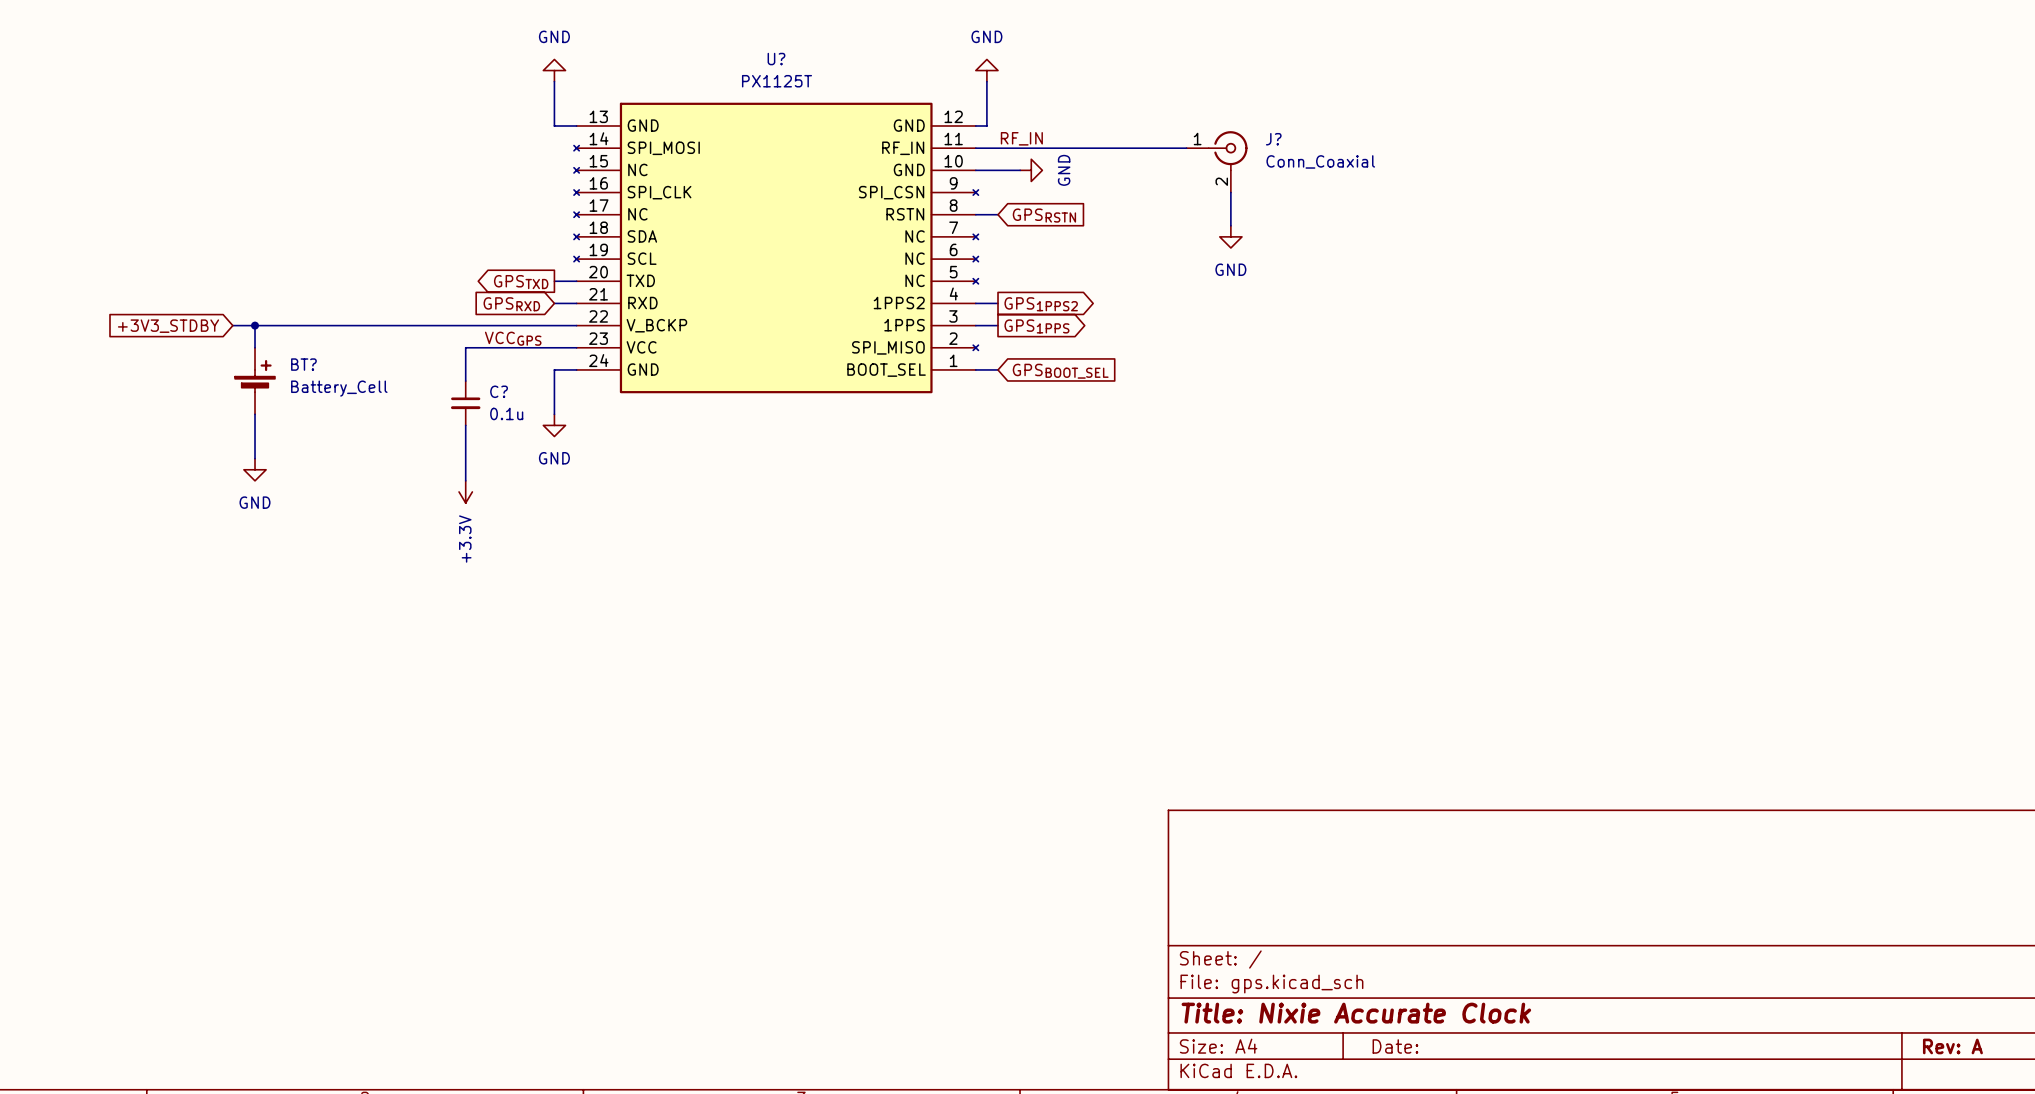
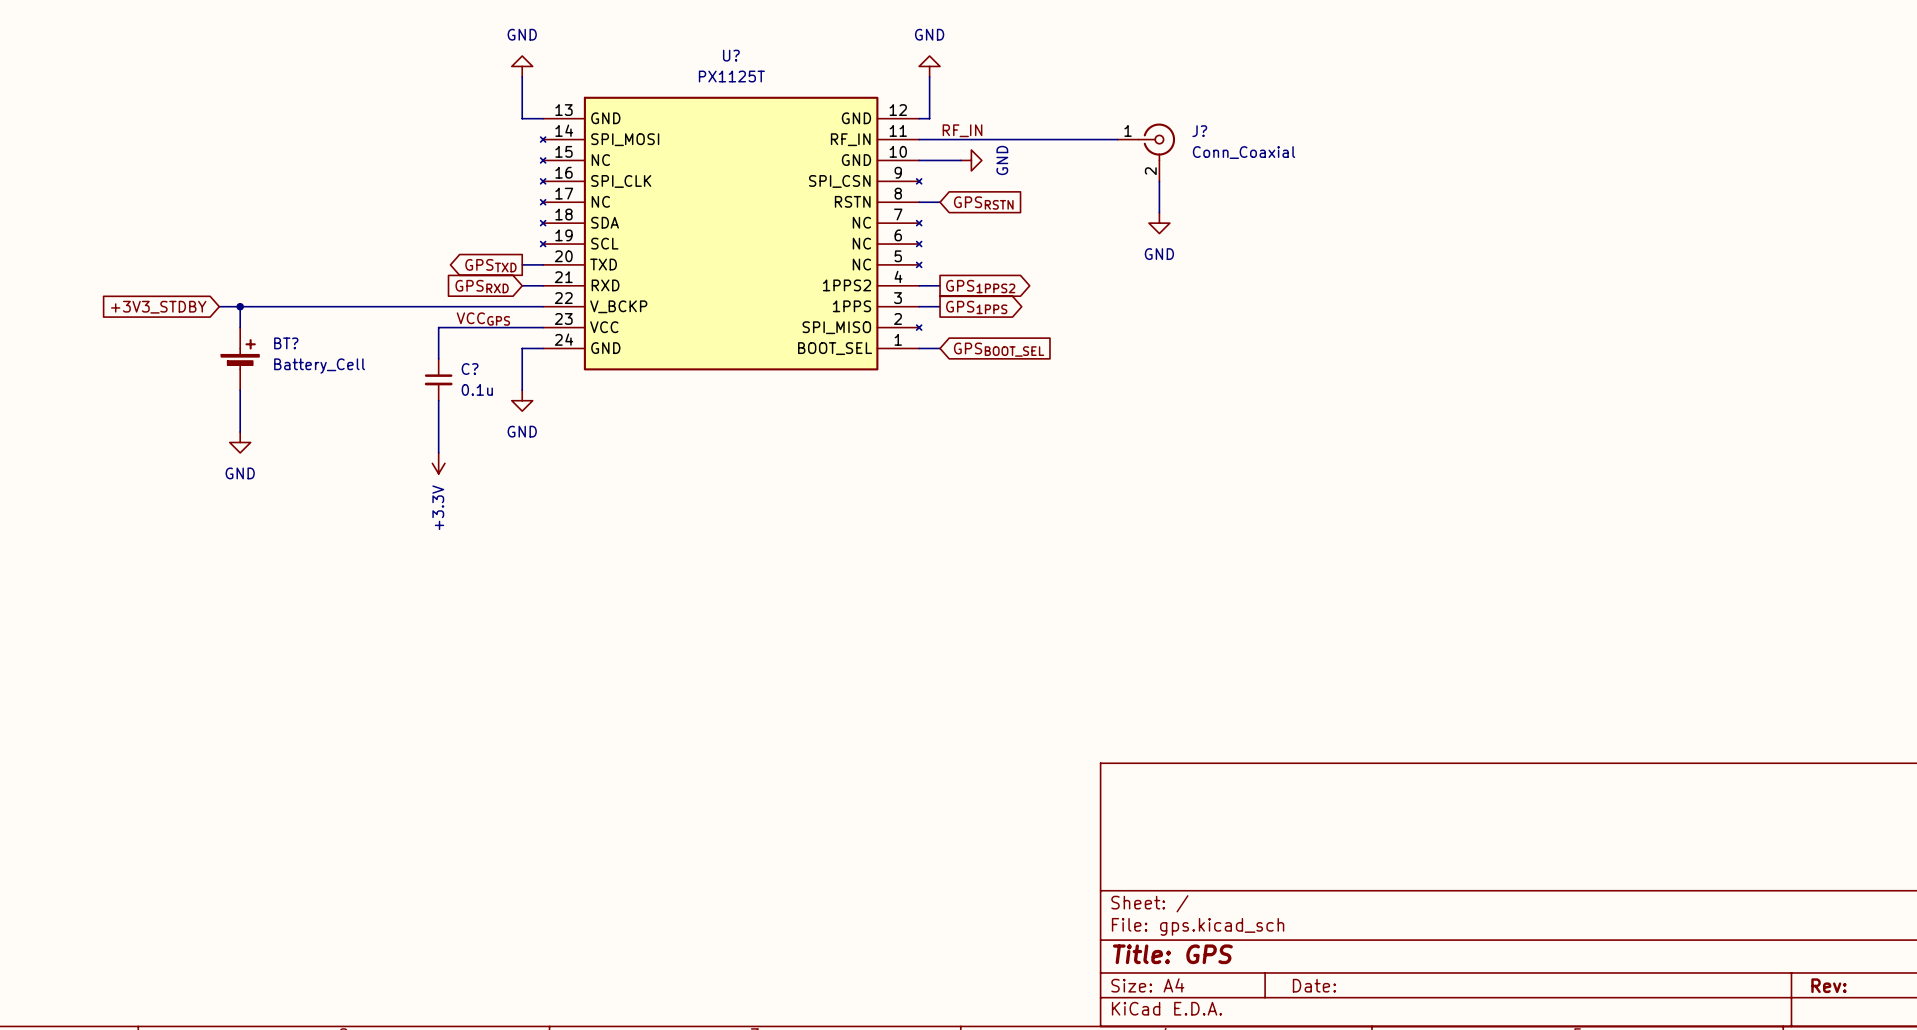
title block: Title: Nixie Accurate Clock (1356, 1013) -> Title: GPS (1172, 954)
title block: Rev: A (1952, 1046) -> Rev: (1828, 985)

